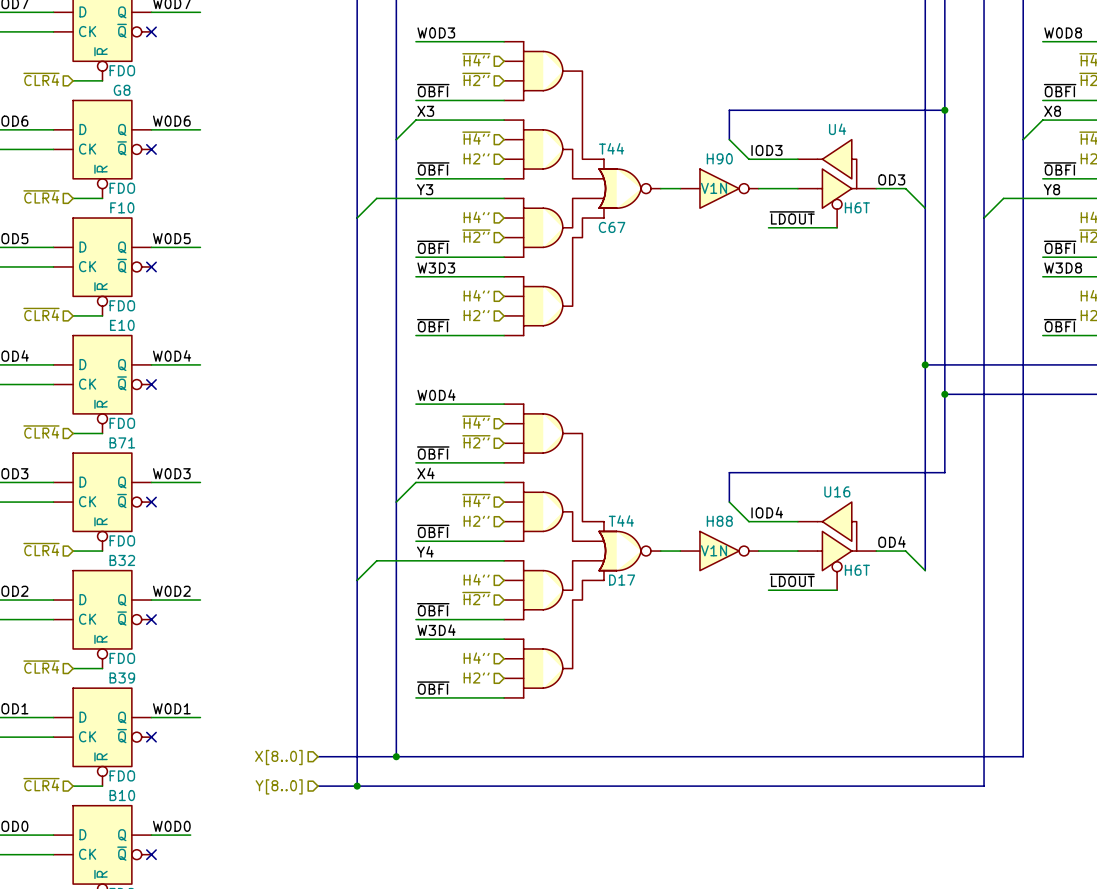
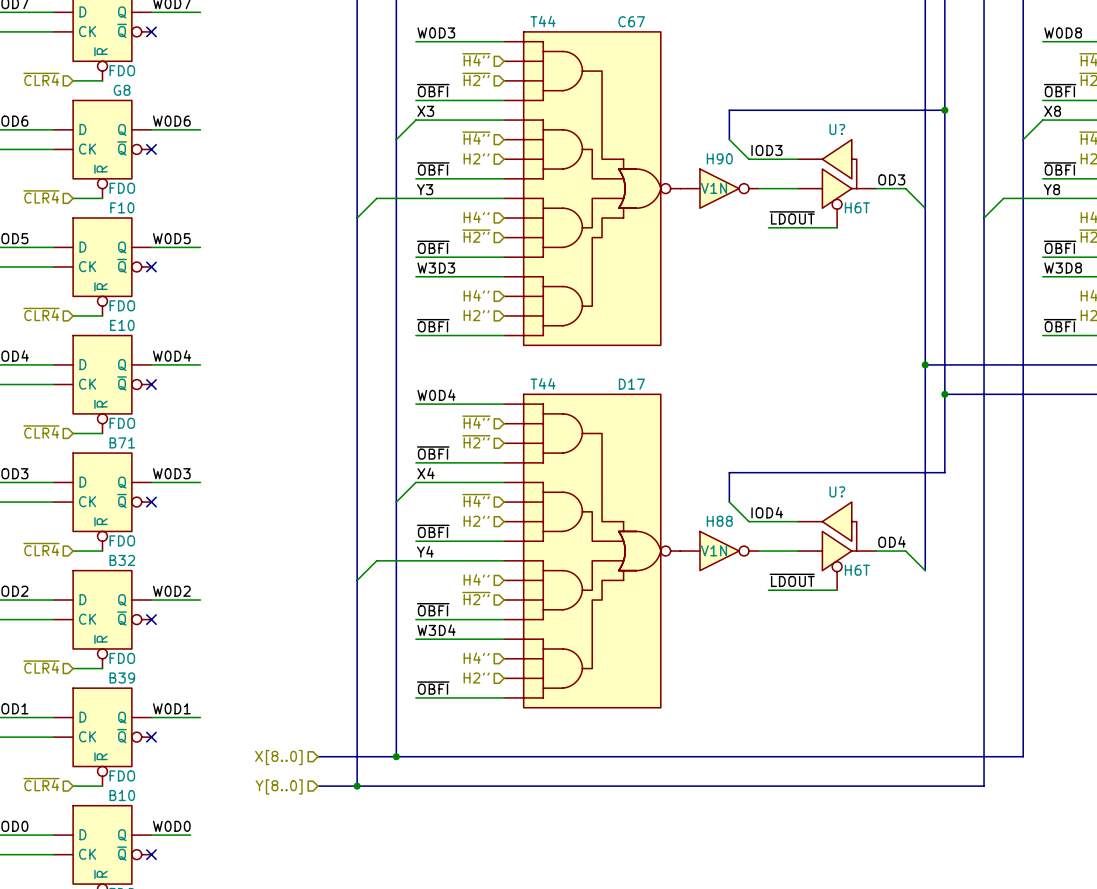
C67 symbol: [504, 41, 661, 336] -> [504, 31, 681, 346]
U4 name: U4 (837, 129) -> U? (837, 129)
C67 value position: T44 (611, 148) -> T44 (543, 21)
C67 name position: C67 (612, 227) -> C67 (631, 21)
D17 symbol: [504, 404, 661, 698] -> [504, 394, 681, 708]
U16 name: U16 (837, 491) -> U? (837, 491)
D17 value position: T44 (621, 521) -> T44 (543, 383)
D17 name position: D17 (622, 580) -> D17 (631, 384)

